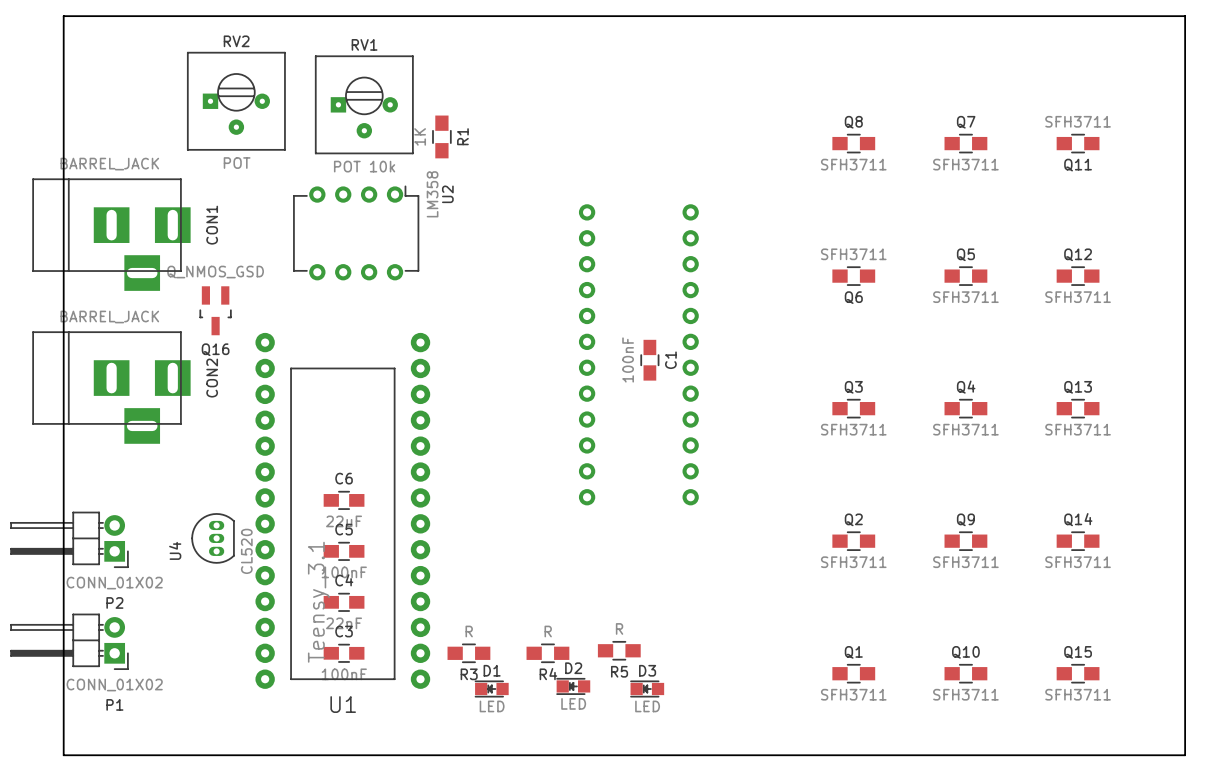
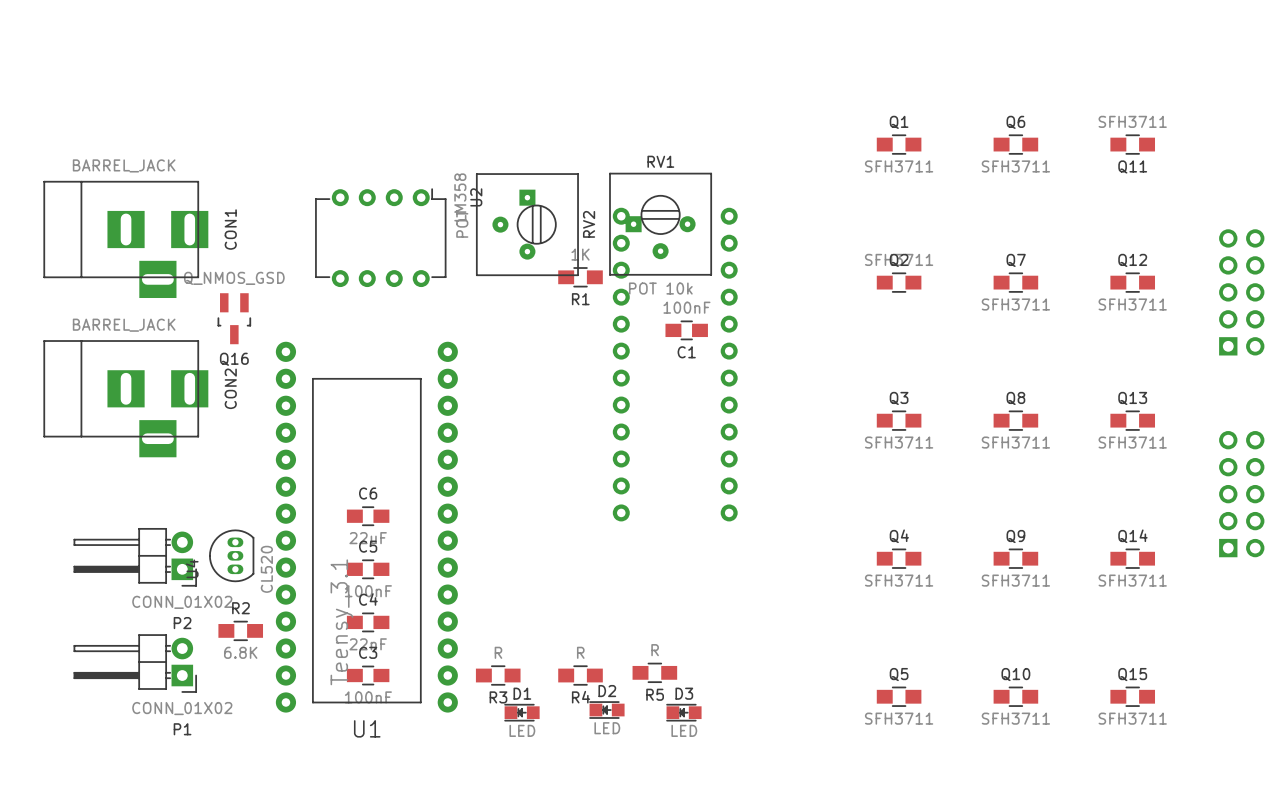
board edge: (63, 16) (63, 755) (1185, 755) (1185, 16) (63, 16) -> none
RV2 rotation: 0° (236, 101) -> 90° clockwise (527, 224)
RV2 position: (236, 101) -> (527, 224)
RV1 position: (364, 104) -> (660, 224)
Q8 name: Q8 (853, 122) -> Q1 (899, 122)
Q7 name: Q7 (966, 122) -> Q6 (1015, 122)
R1 rotation: 0° (441, 136) -> 90° clockwise (580, 277)
R1 position: (441, 136) -> (580, 277)
Q5 name: Q5 (965, 254) -> Q7 (1016, 260)
part: none -> (1241, 292)
Q6 name: Q6 (853, 297) -> Q2 (899, 260)
C1 rotation: 0° (649, 360) -> 90° clockwise (686, 330)
C1 position: (649, 360) -> (686, 330)
Q4 name: Q4 (966, 387) -> Q8 (1015, 398)
part: none -> (1241, 494)
Q2 name: Q2 (853, 519) -> Q4 (899, 536)
P2 position: (69, 539) -> (135, 557)
R2: none -> 6.8K (240, 630)
P1 position: (69, 641) -> (135, 663)
Q1 name: Q1 (853, 652) -> Q5 (899, 674)

